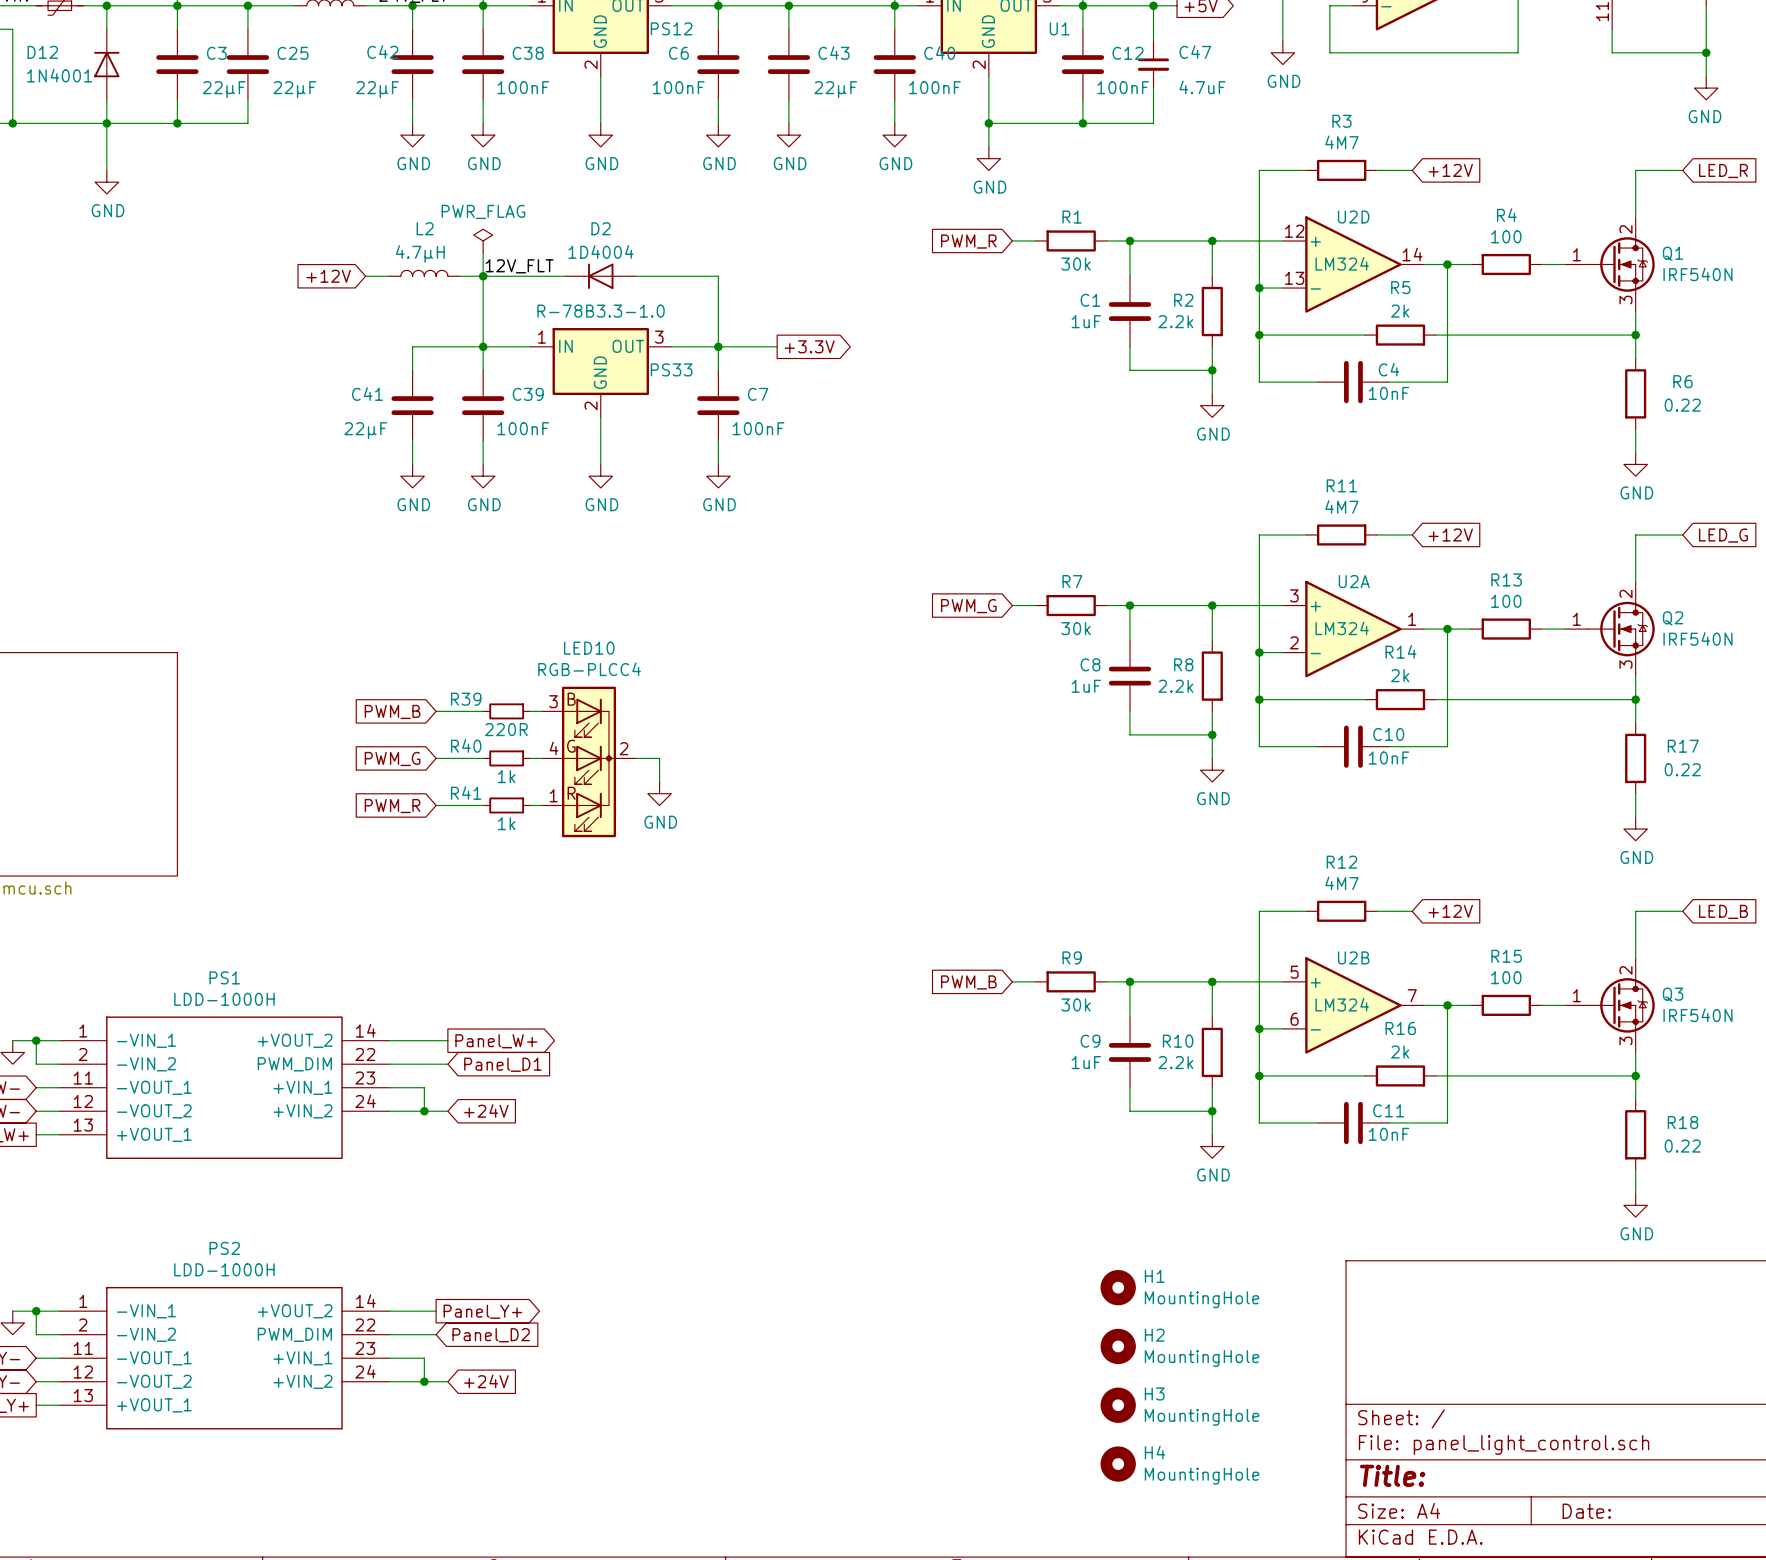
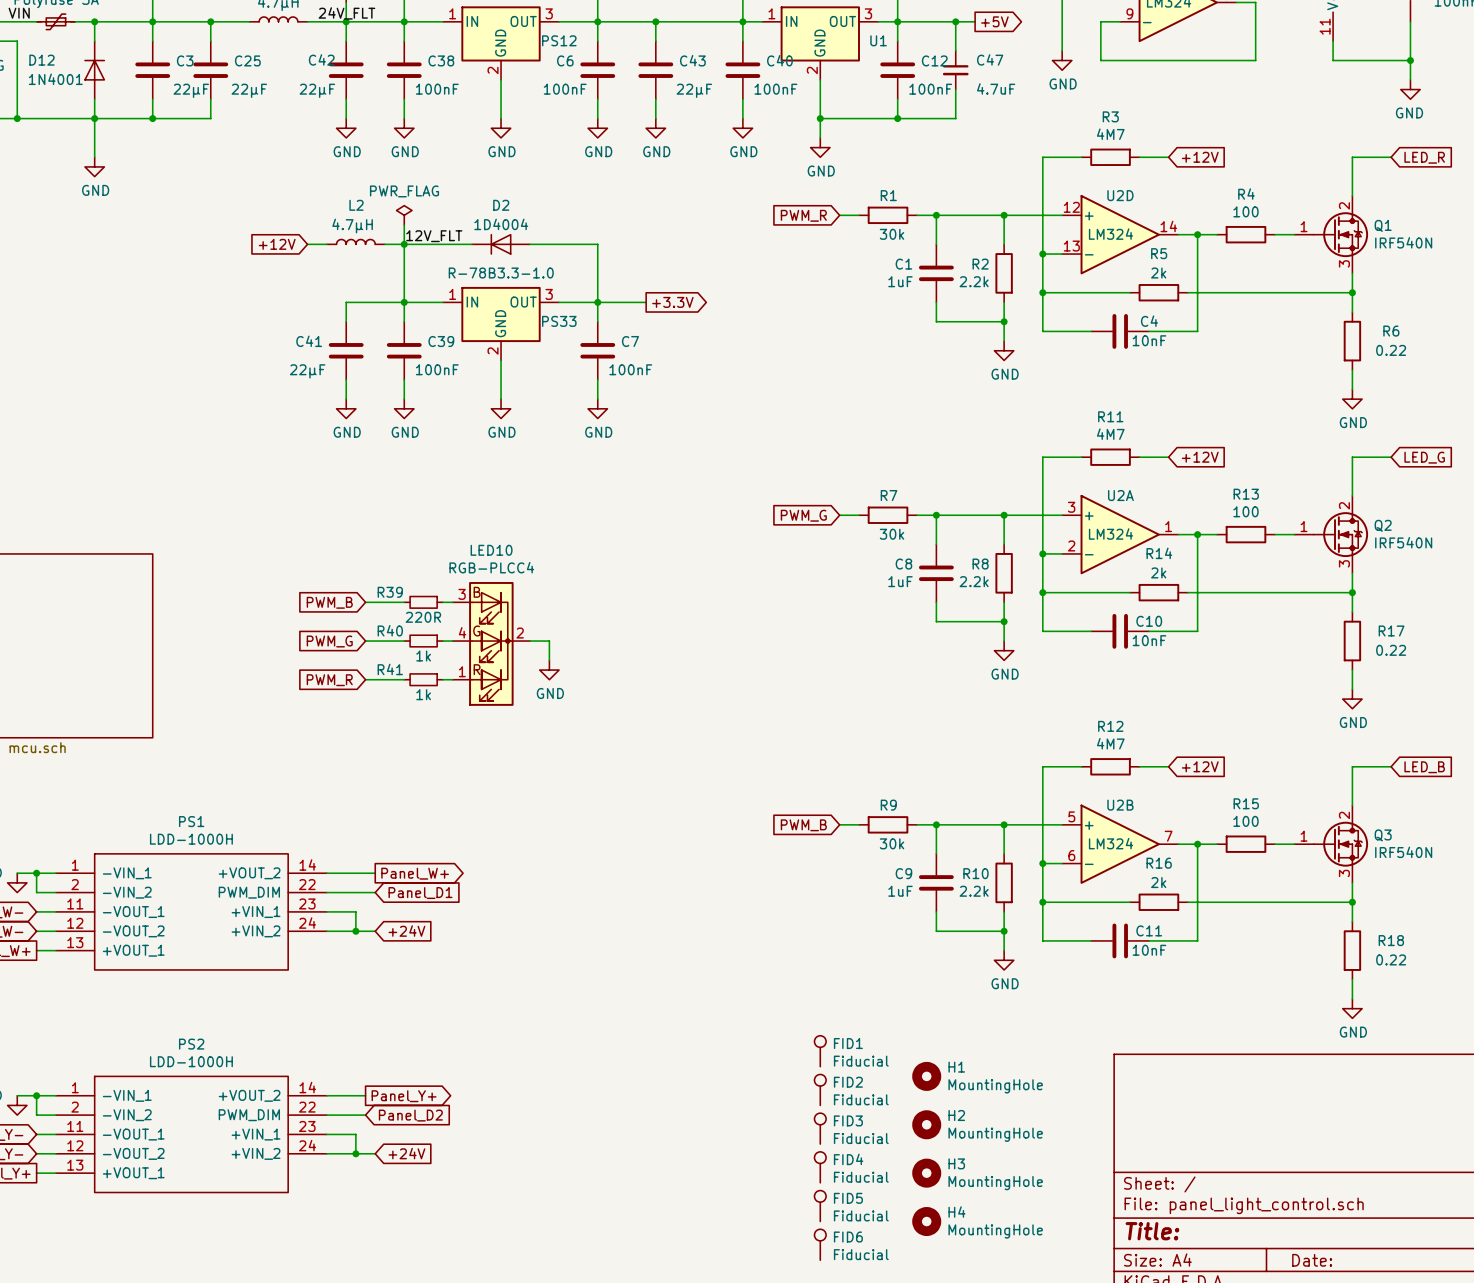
FID1: none -> Fiducial (820, 1051)
FID2: none -> Fiducial (820, 1089)
FID3: none -> Fiducial (820, 1128)
FID4: none -> Fiducial (820, 1167)
FID5: none -> Fiducial (820, 1206)
FID6: none -> Fiducial (820, 1244)

